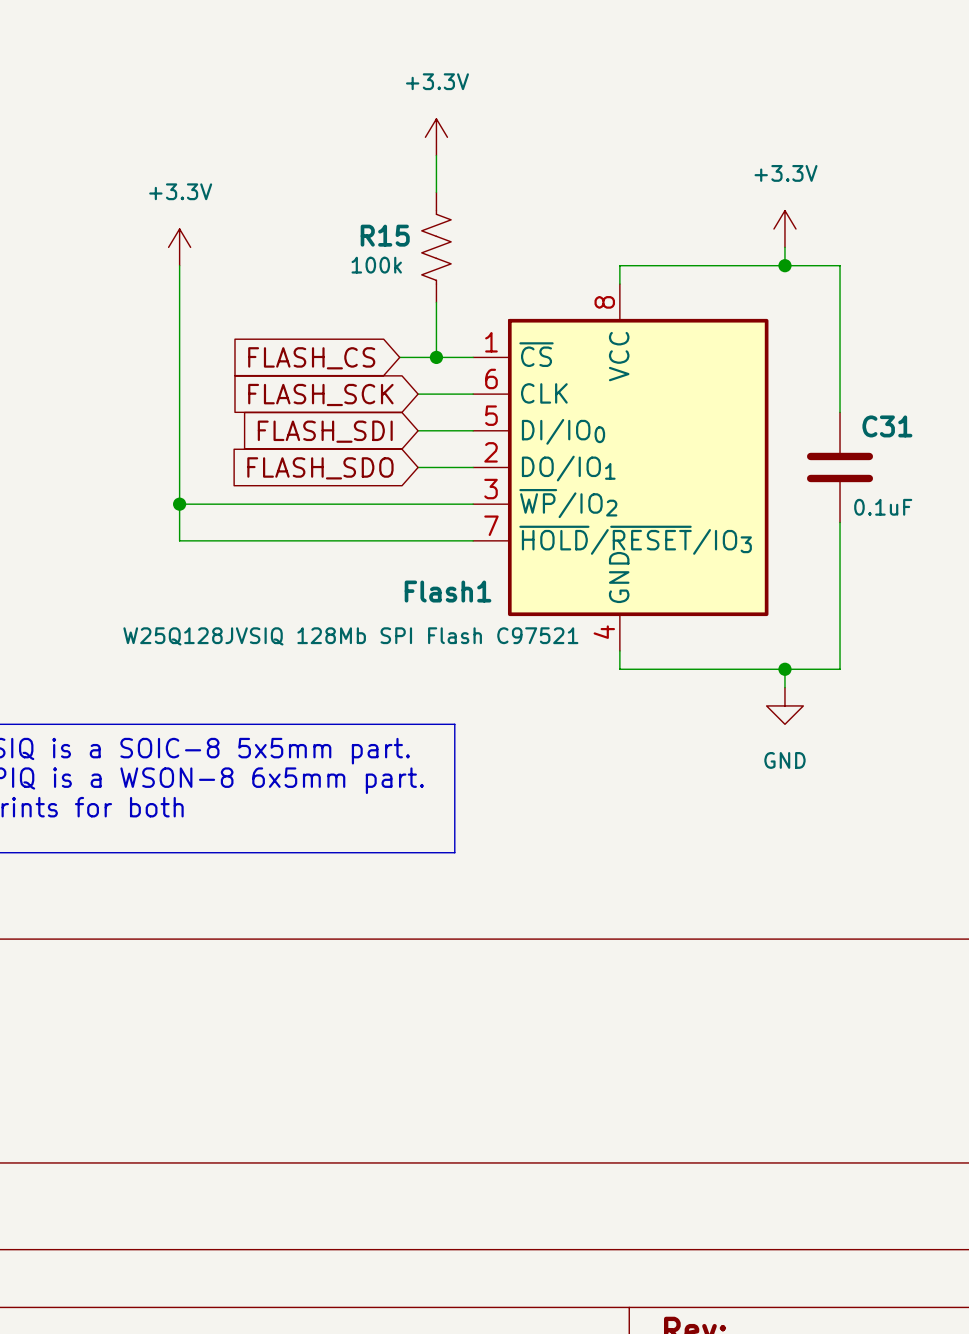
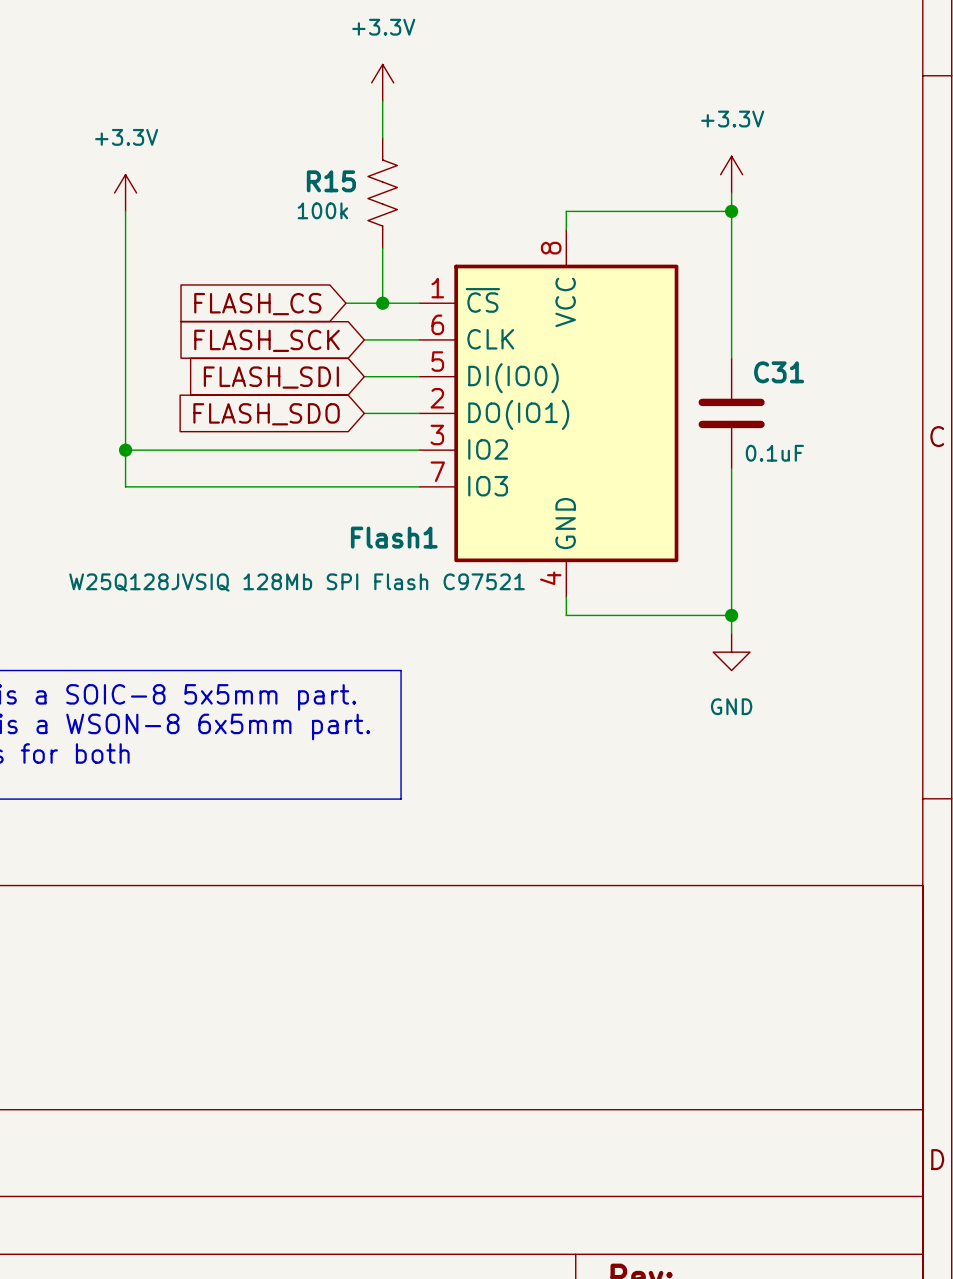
wire: (784, 265) (840, 265) (840, 412) -> (731, 211) (731, 358)
Flash1 symbol: [473, 284, 769, 651] -> [419, 229, 679, 598]
C31 position: (840, 467) -> (731, 413)
wire: (840, 522) (840, 669) (784, 669) -> (731, 468) (731, 615)

